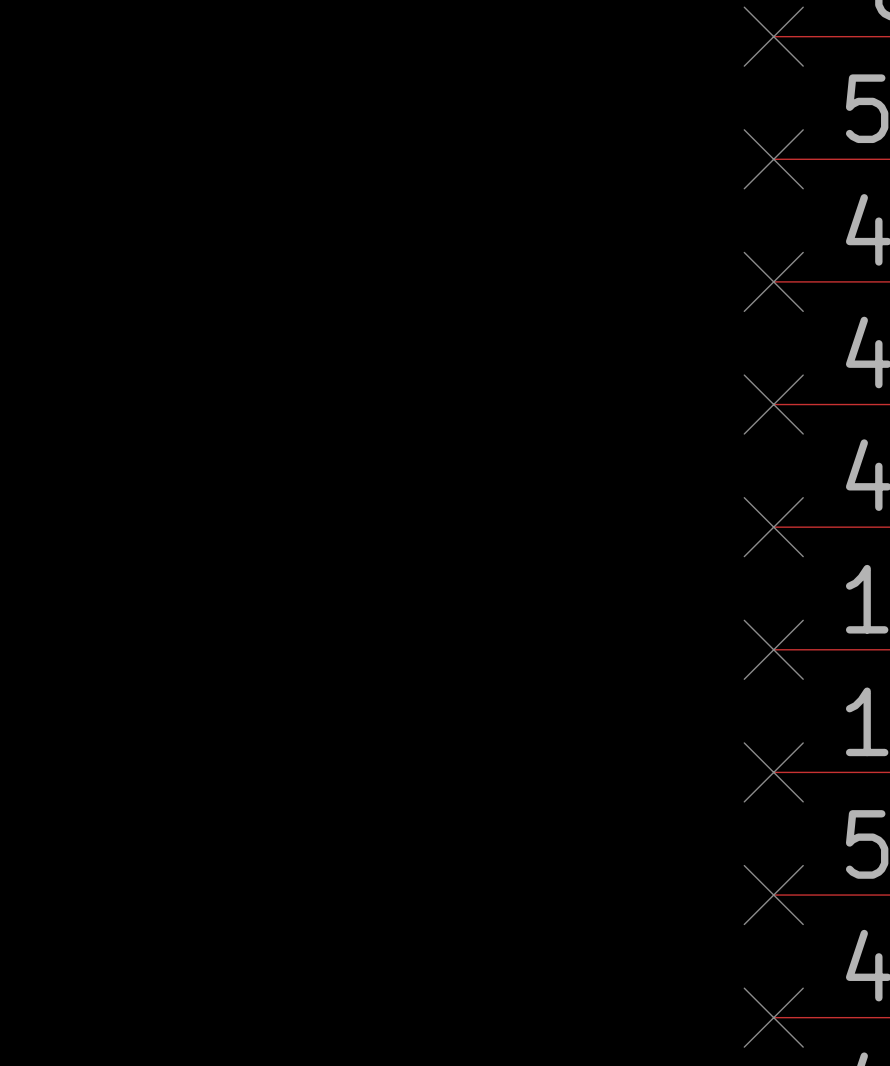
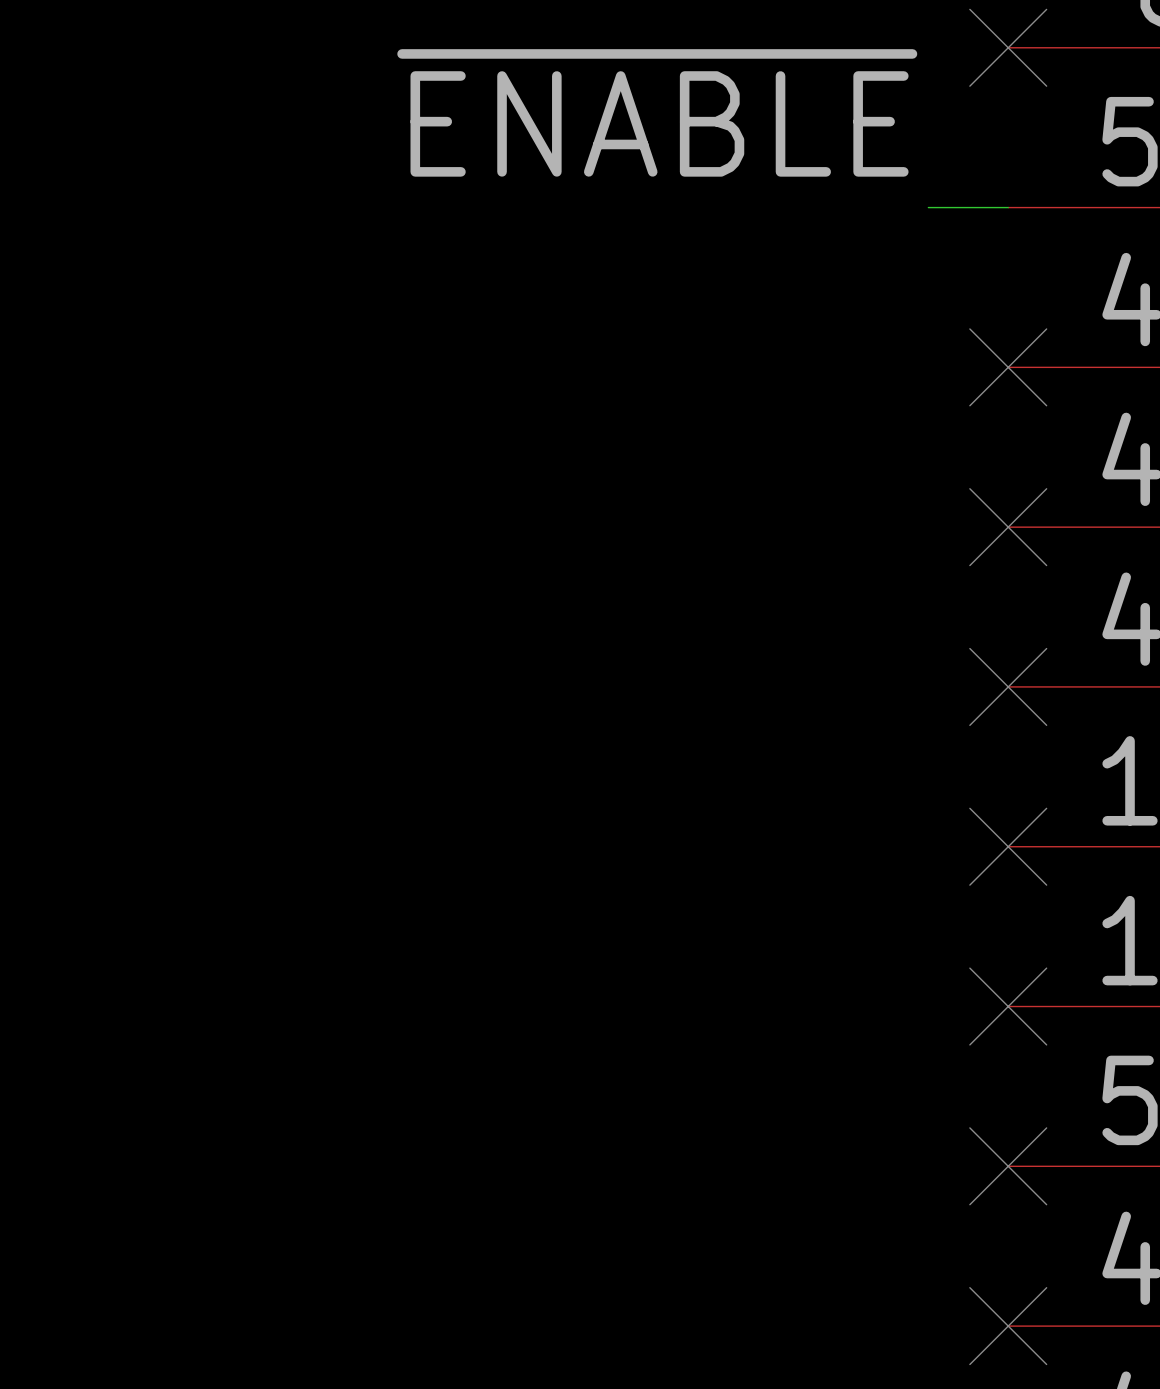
label: none -> ~{ENABLE} (657, 112)
wire: none -> (928, 207) (1008, 207)
no-connect mark: (773, 159) -> none

